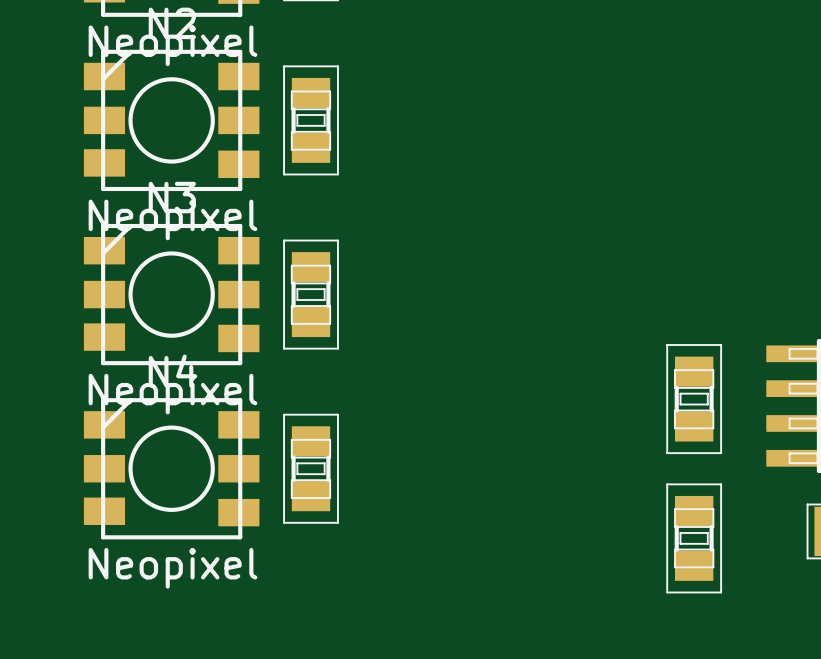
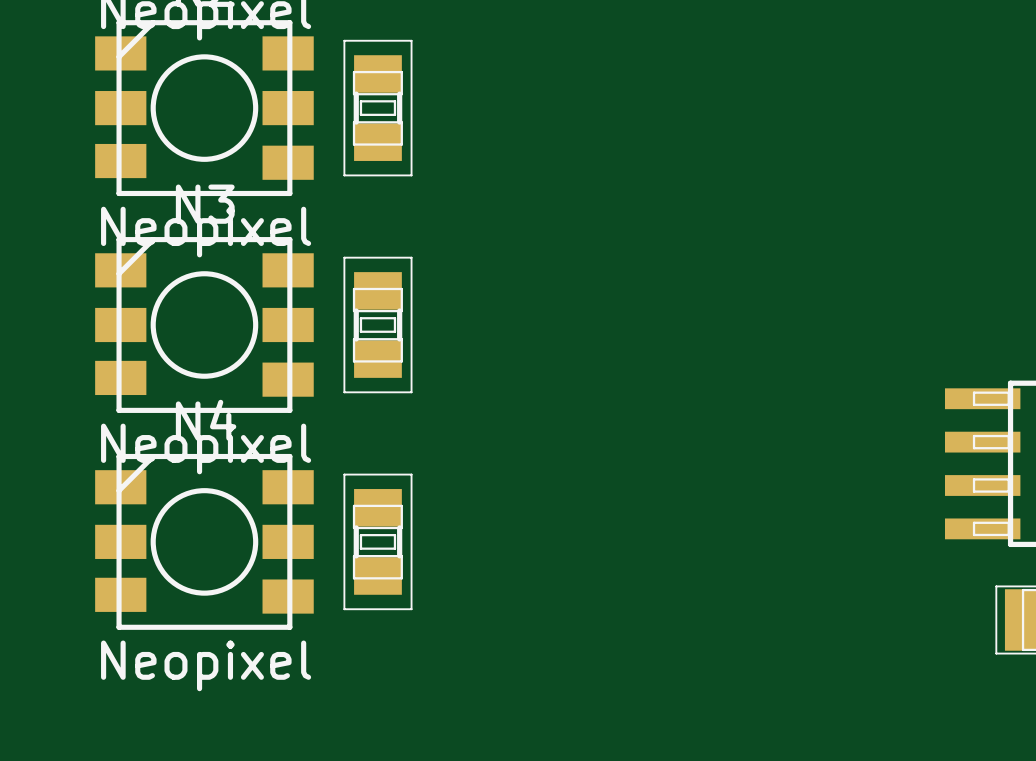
part: (694, 399) -> none
part: (694, 538) -> none

